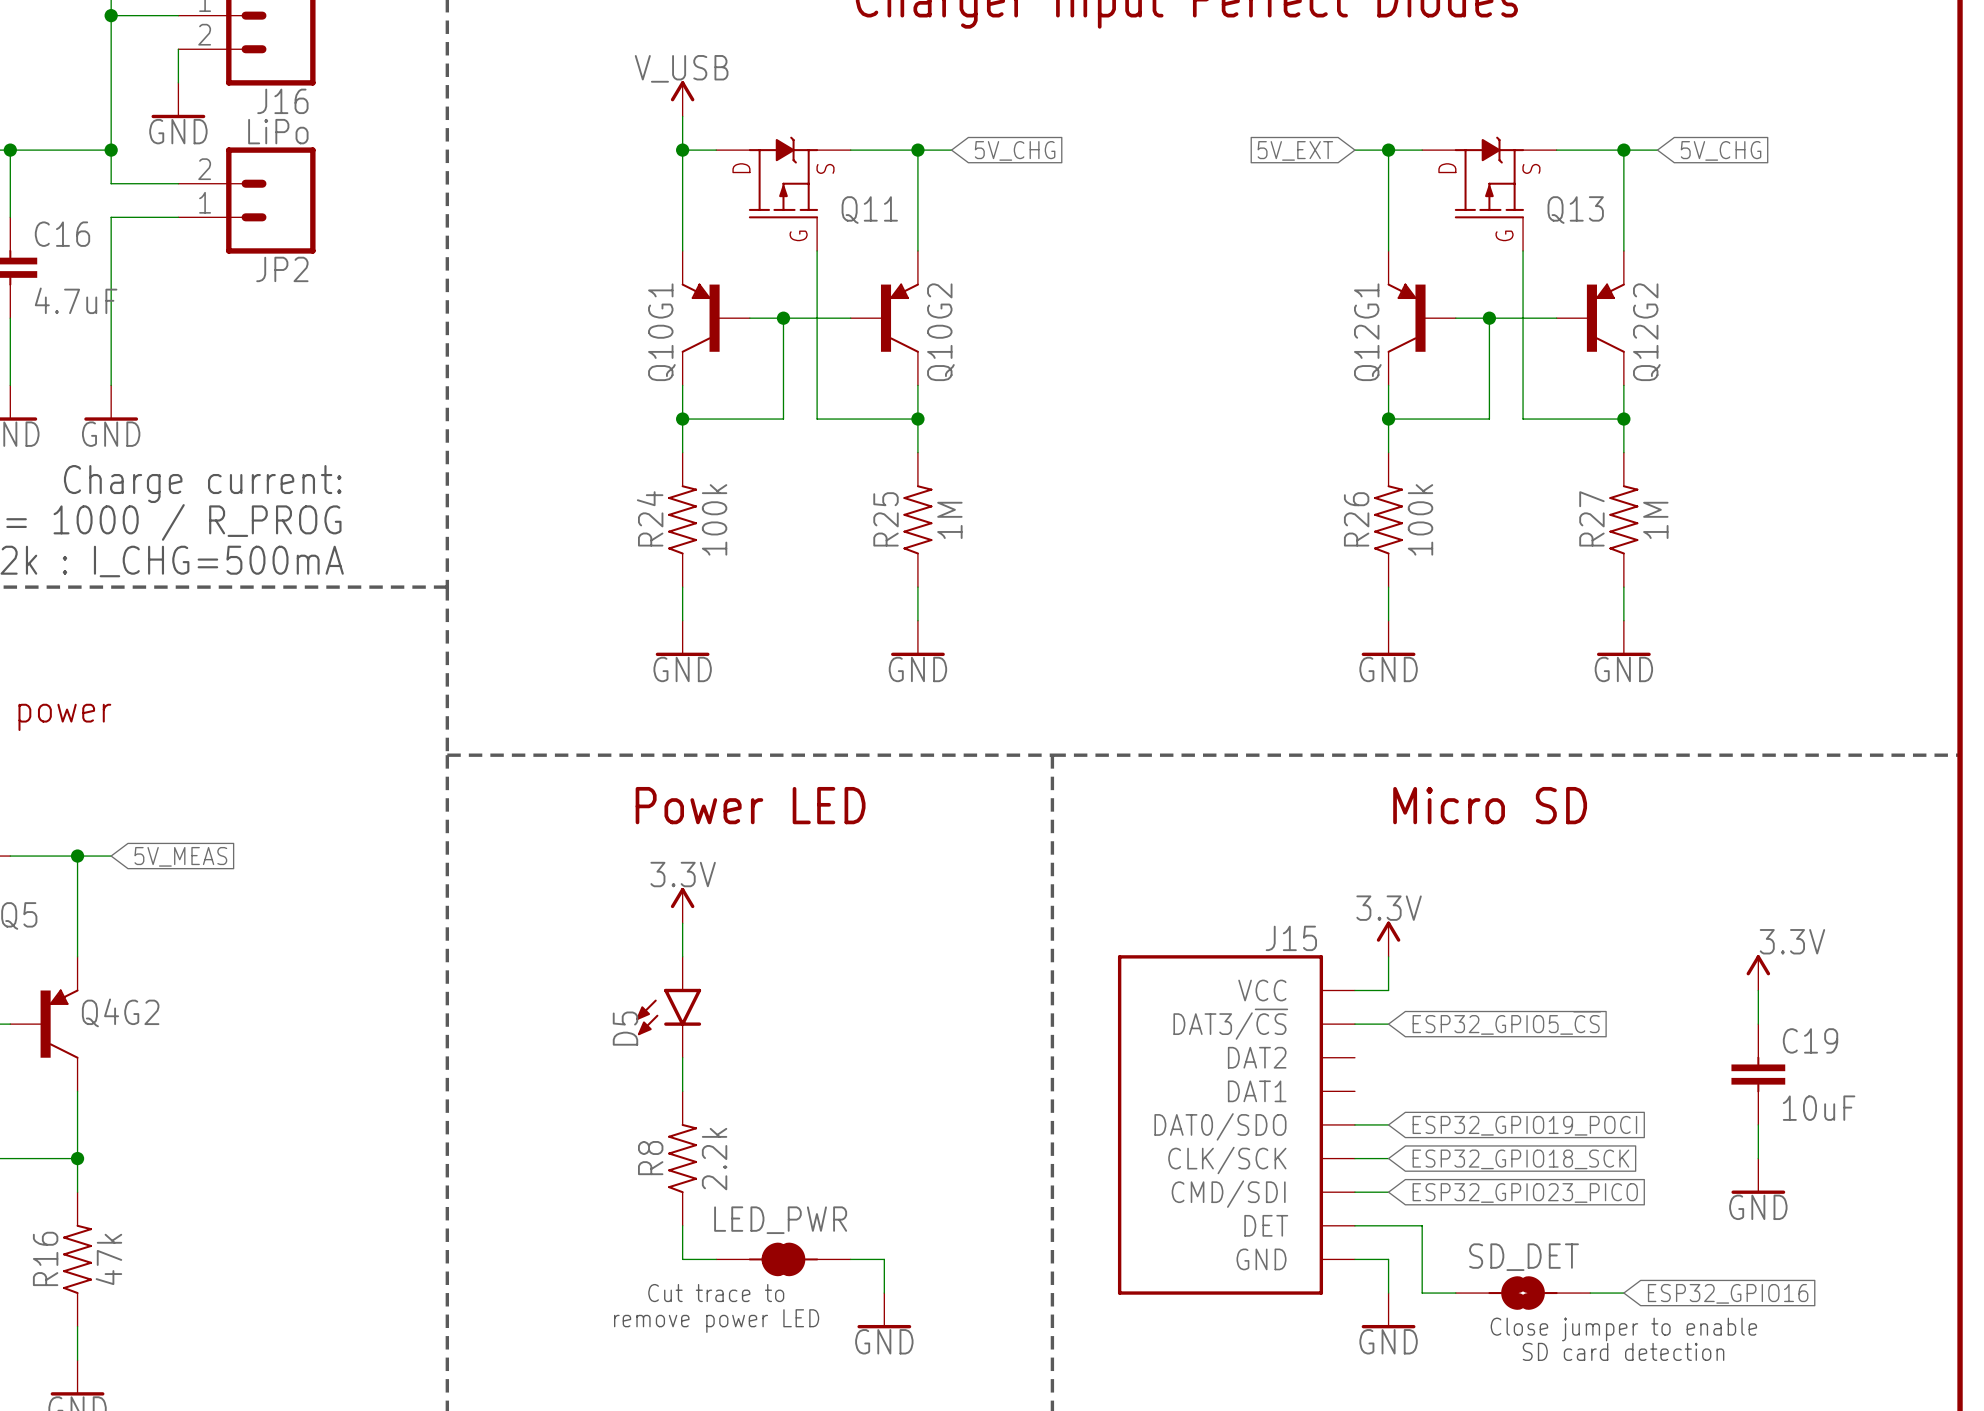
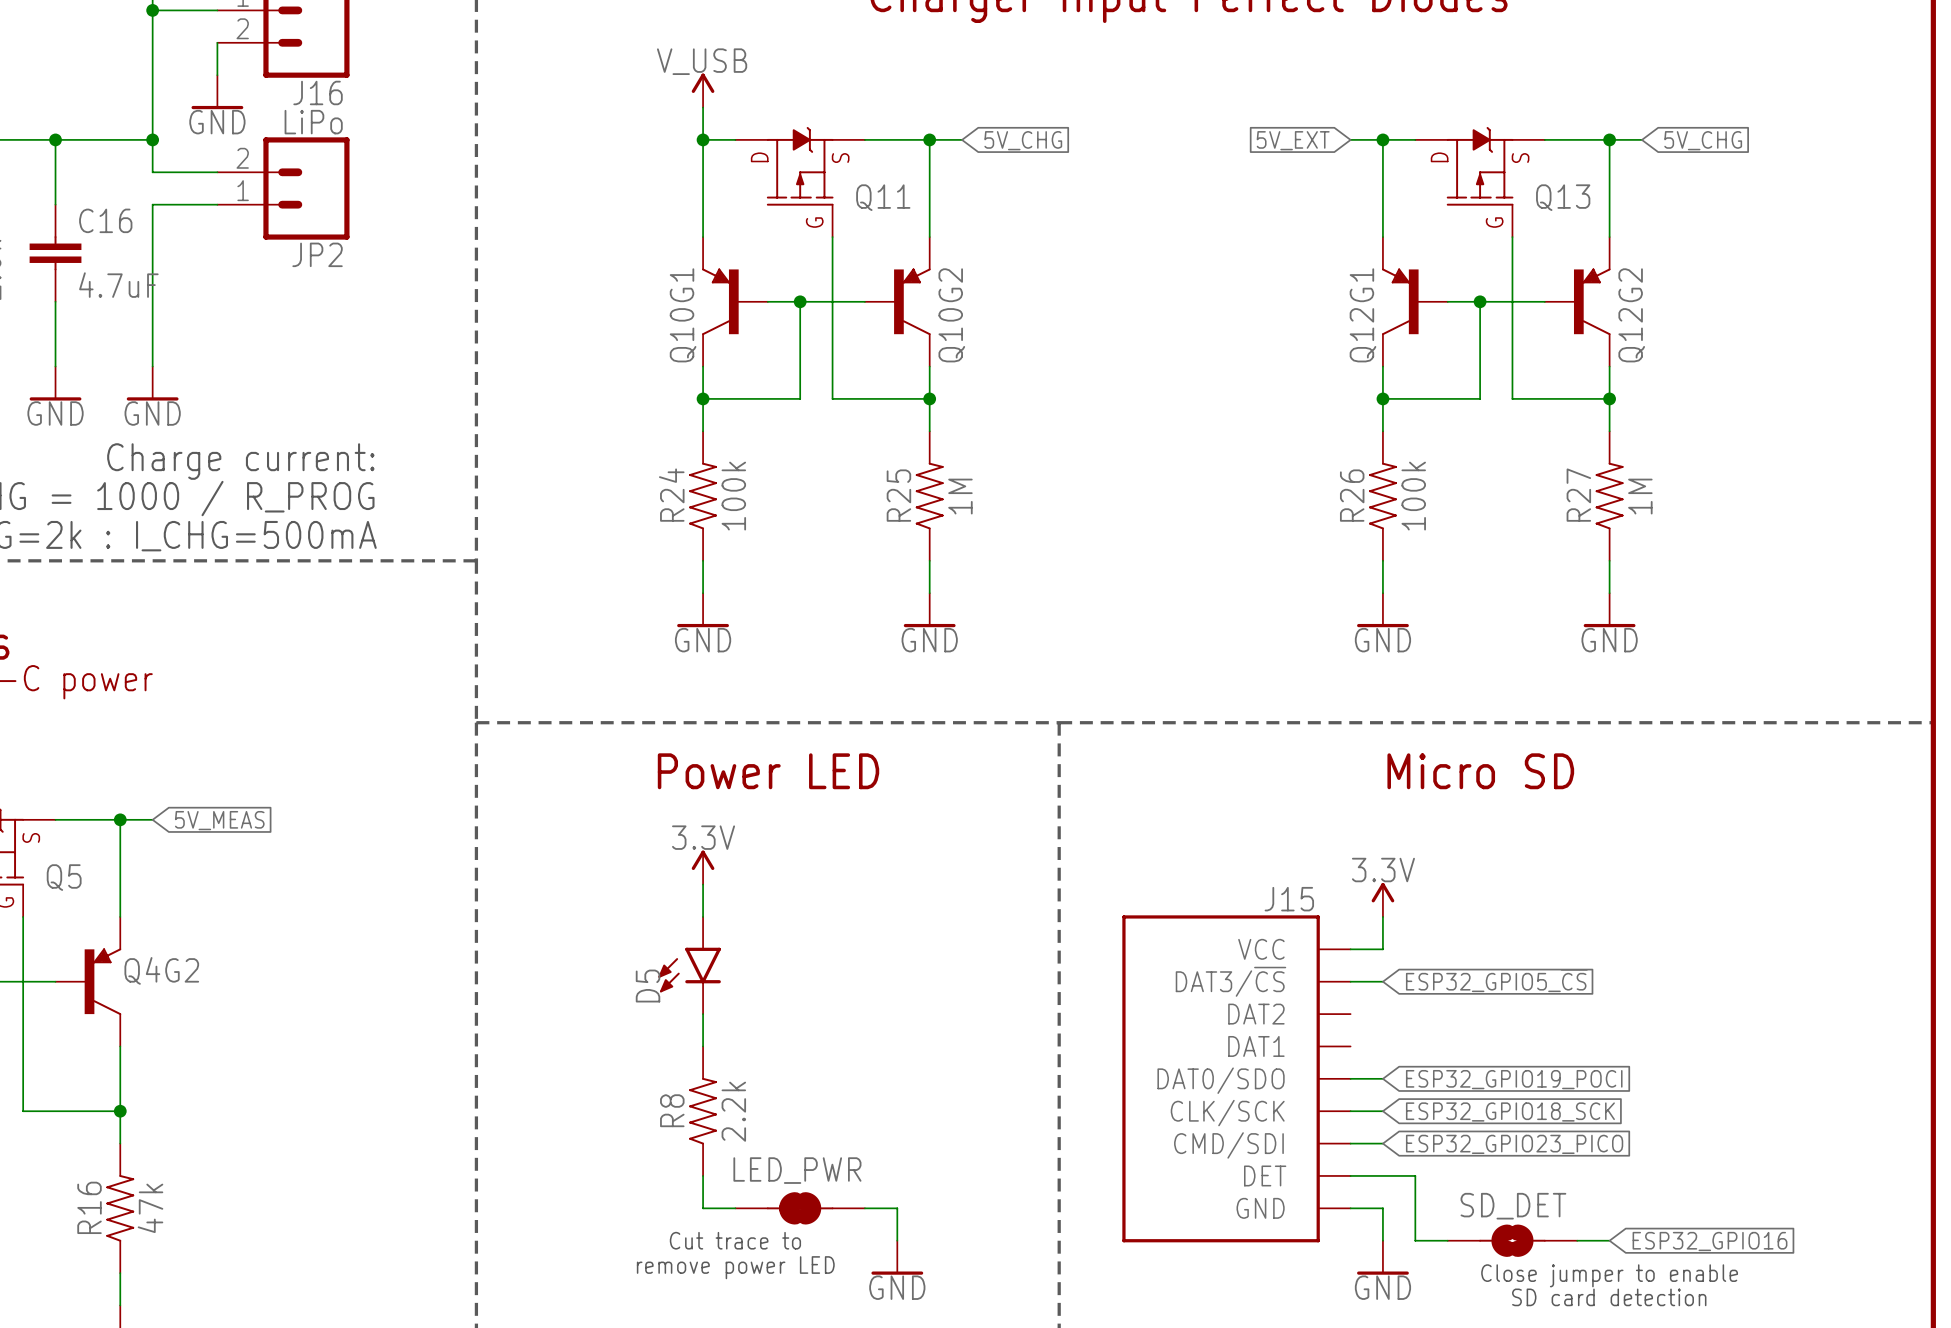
power symbol: 3.3V (1758, 972) -> none
wire: (1758, 990) (1758, 1024) -> none
C19: 10uF (1758, 1074) -> none
wire: (1758, 1124) (1758, 1158) -> none
power symbol: GND (1758, 1176) -> none

